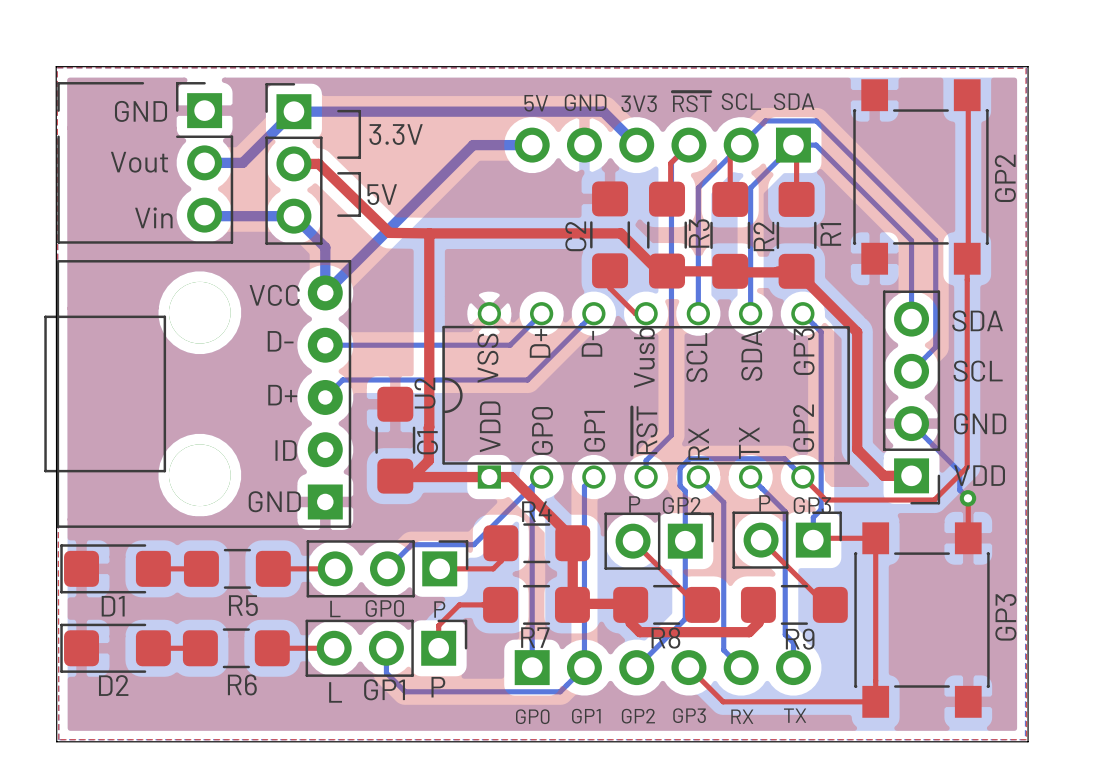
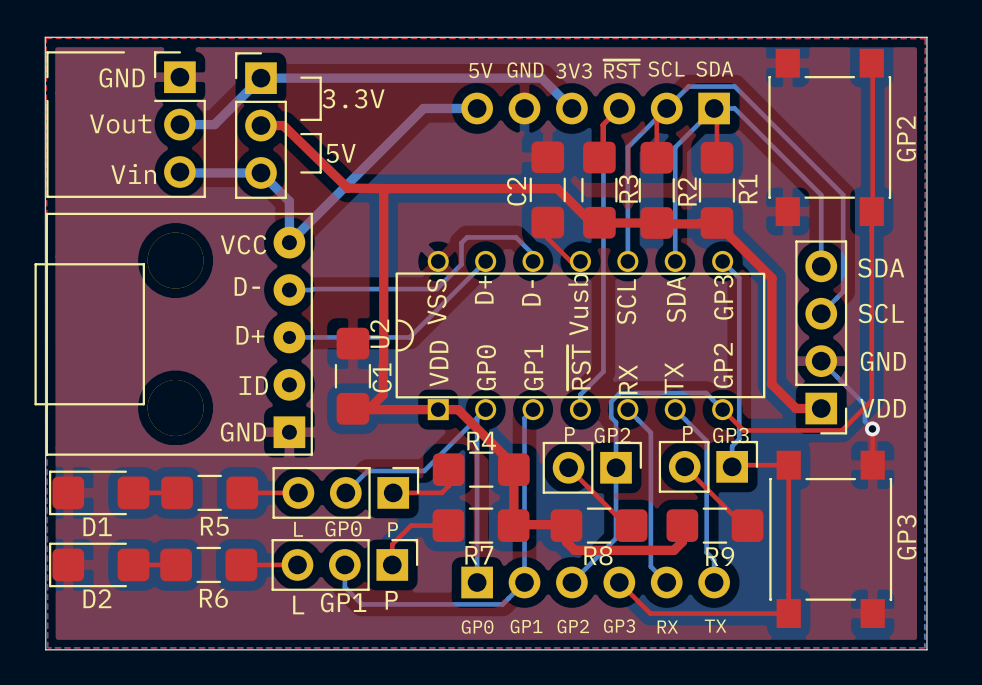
bottom track: none -> (533, 260) (533, 254) (515, 237) (467, 237) (461, 242) (461, 264) (436, 289) (311, 290)
bottom track: (593, 313) (527, 379) (342, 379) (325, 397) -> none
bottom track: (350, 345) (510, 345) -> (289, 337) (409, 337) (457, 290)

